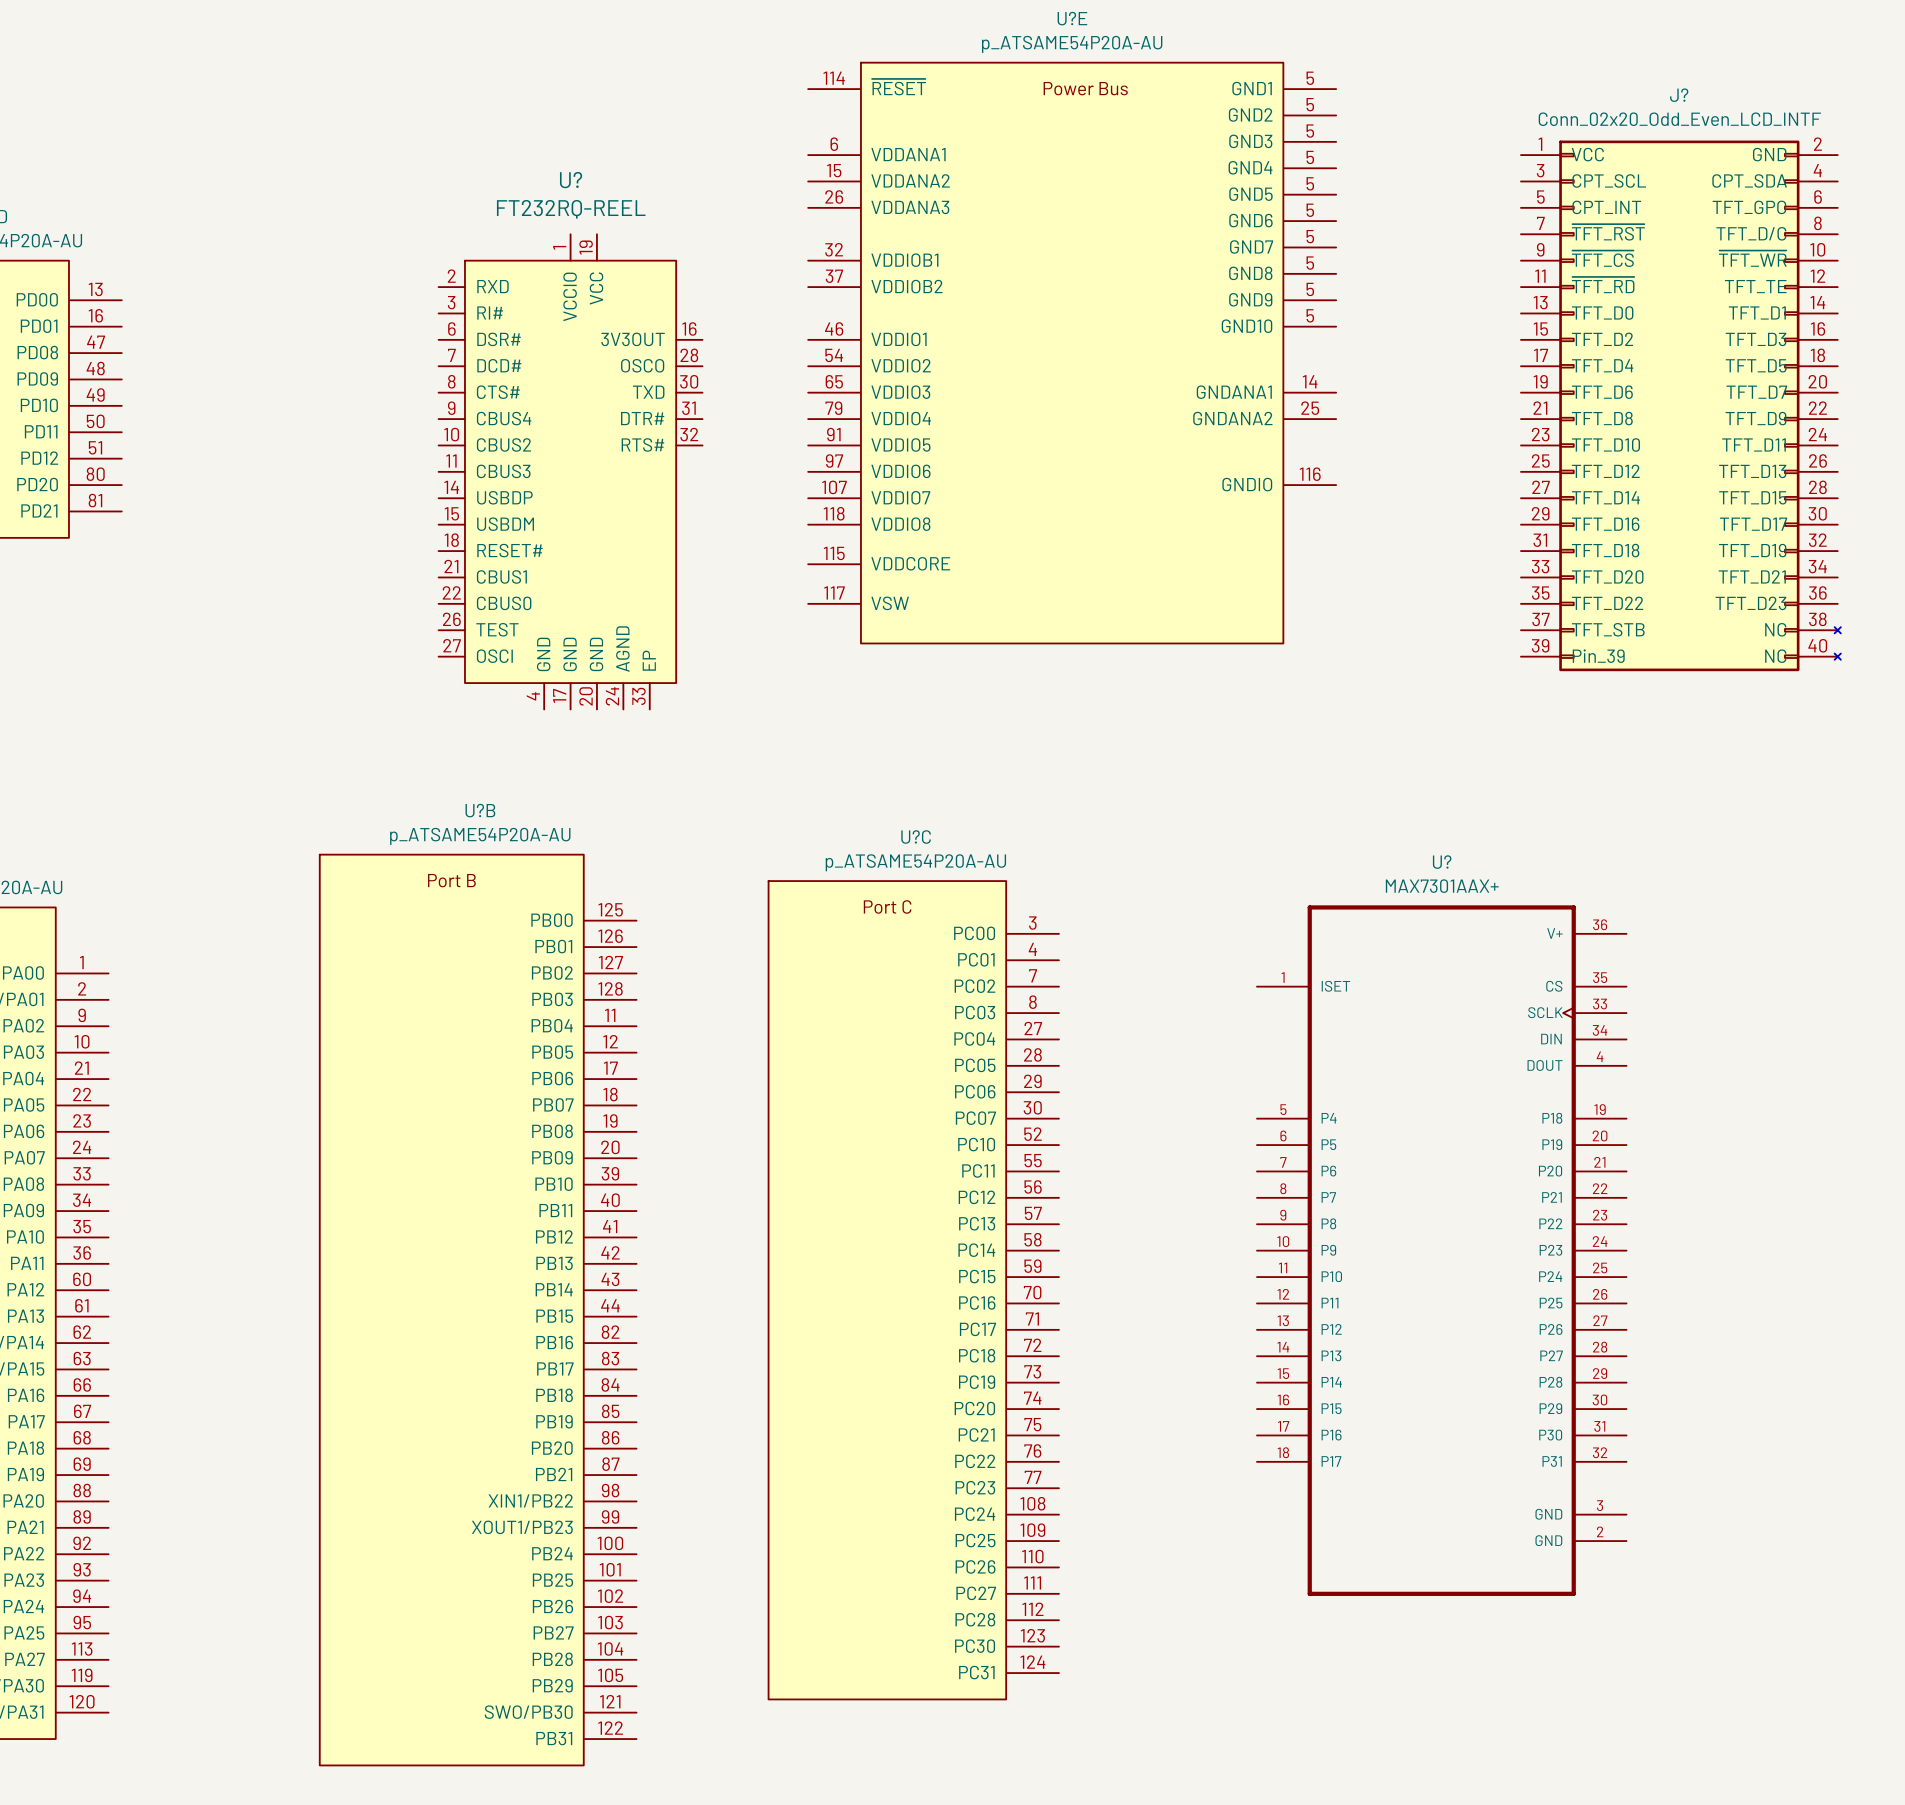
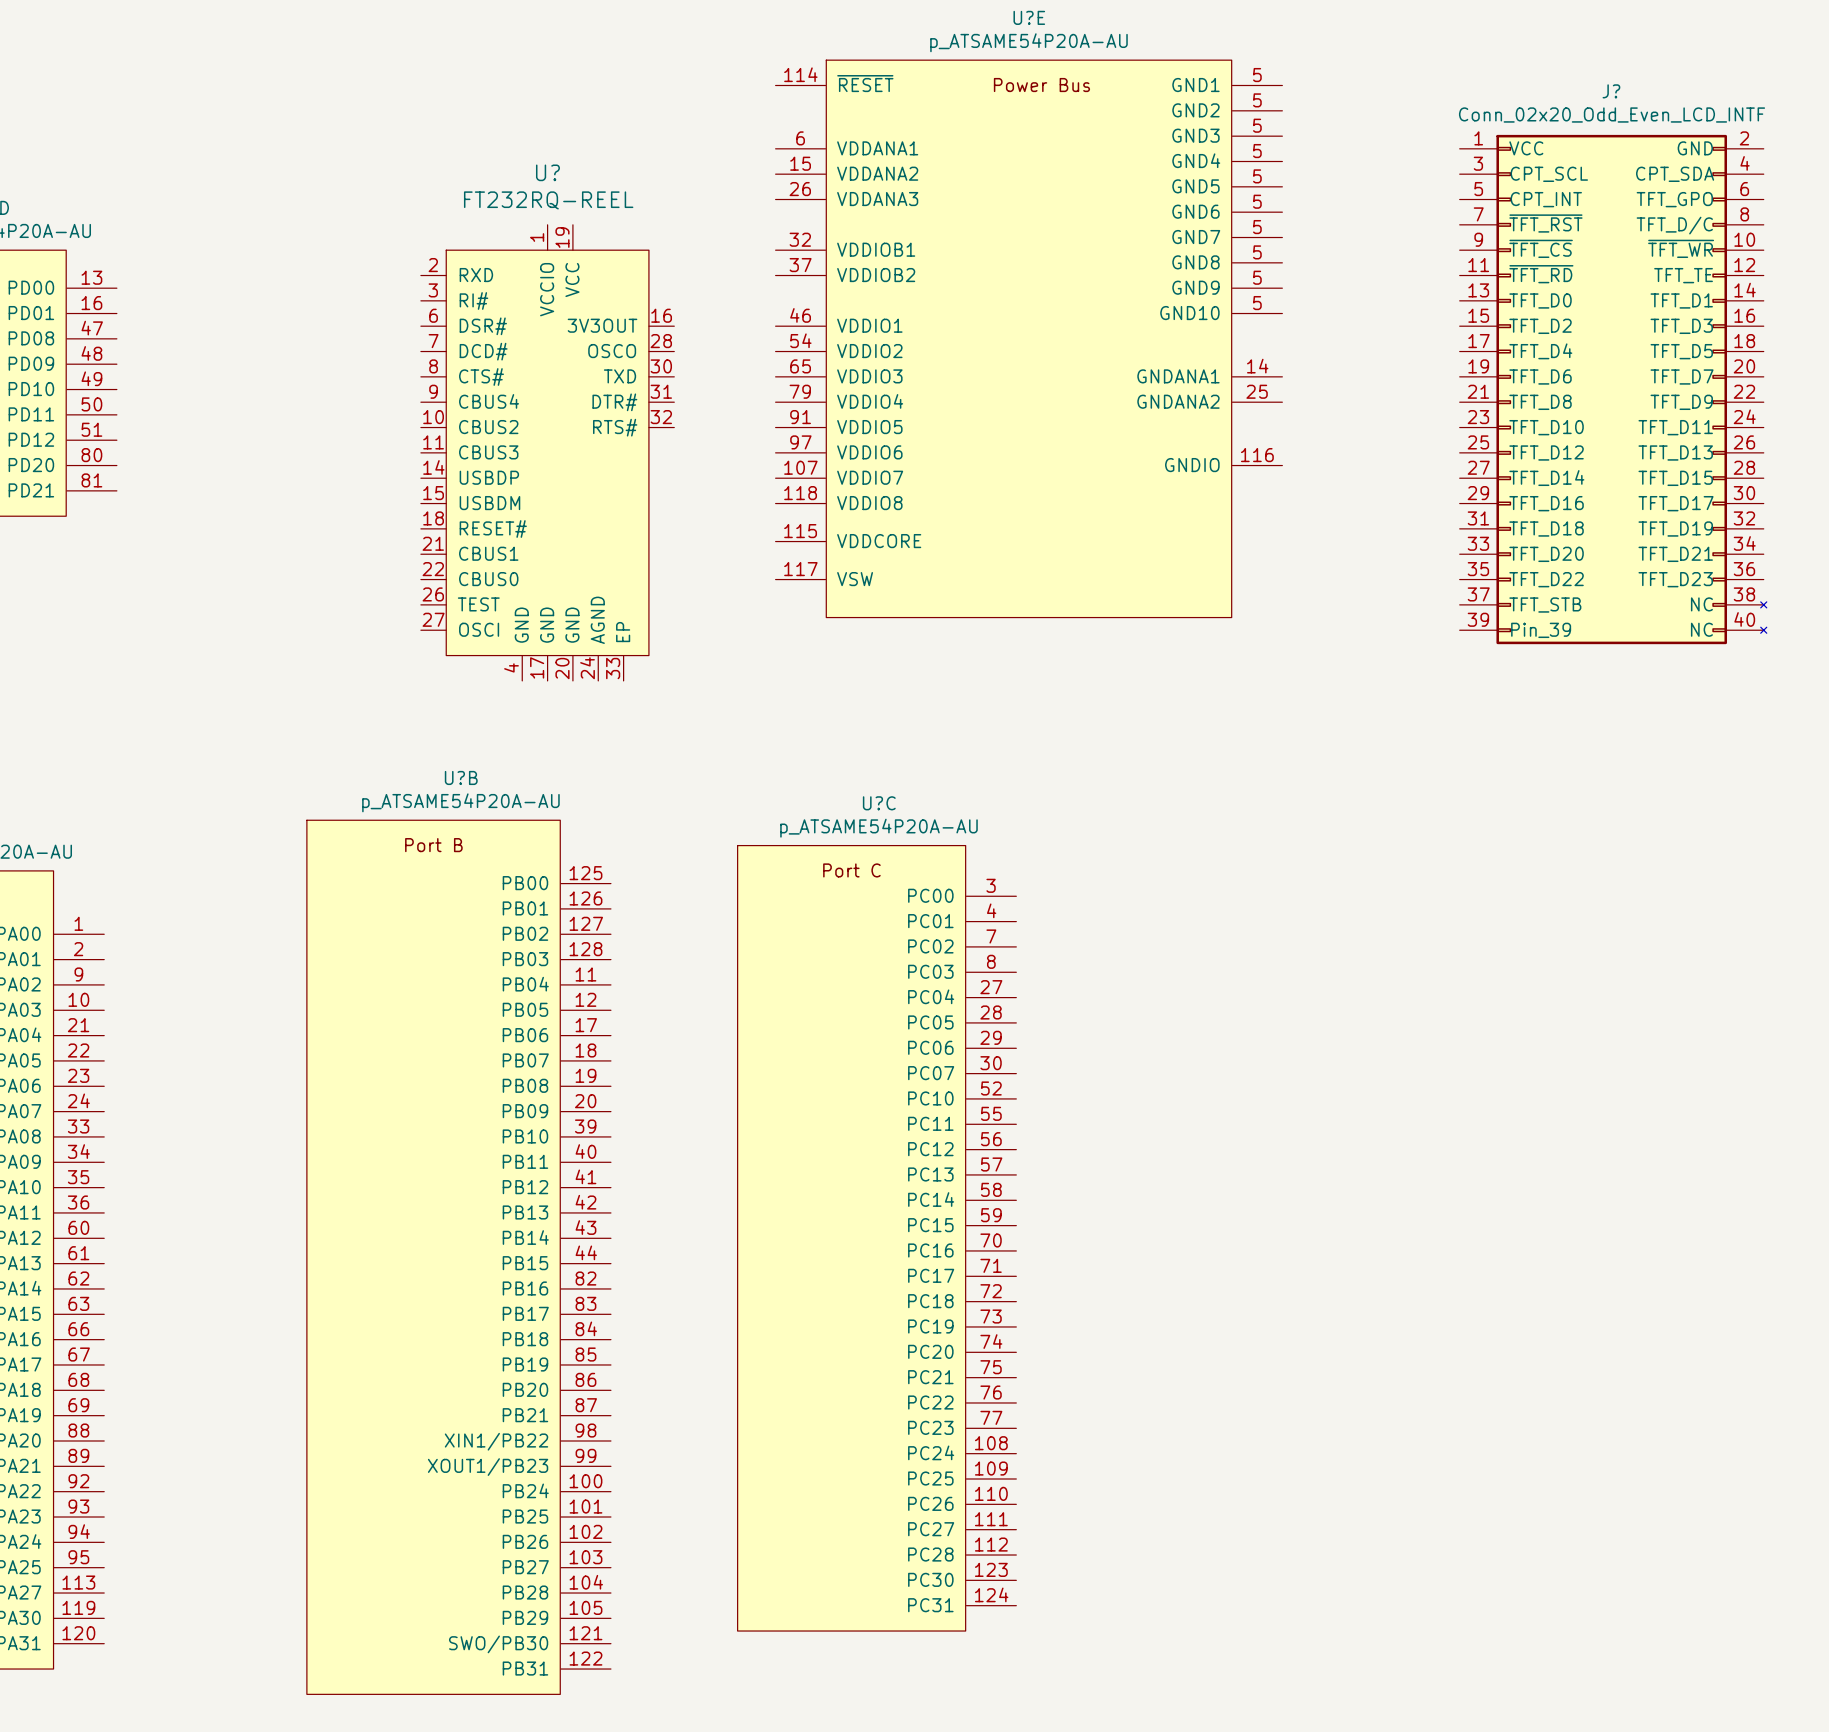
U?: MAX7301AAX+ (1441, 1250) -> none

